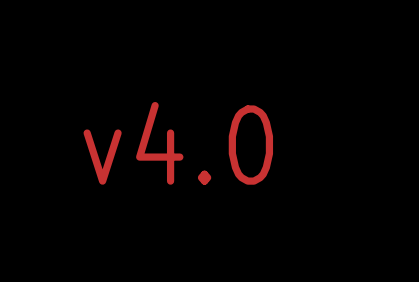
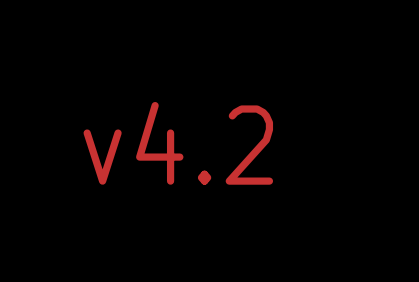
text: v4.0 (178, 143) -> v4.2 (178, 143)

